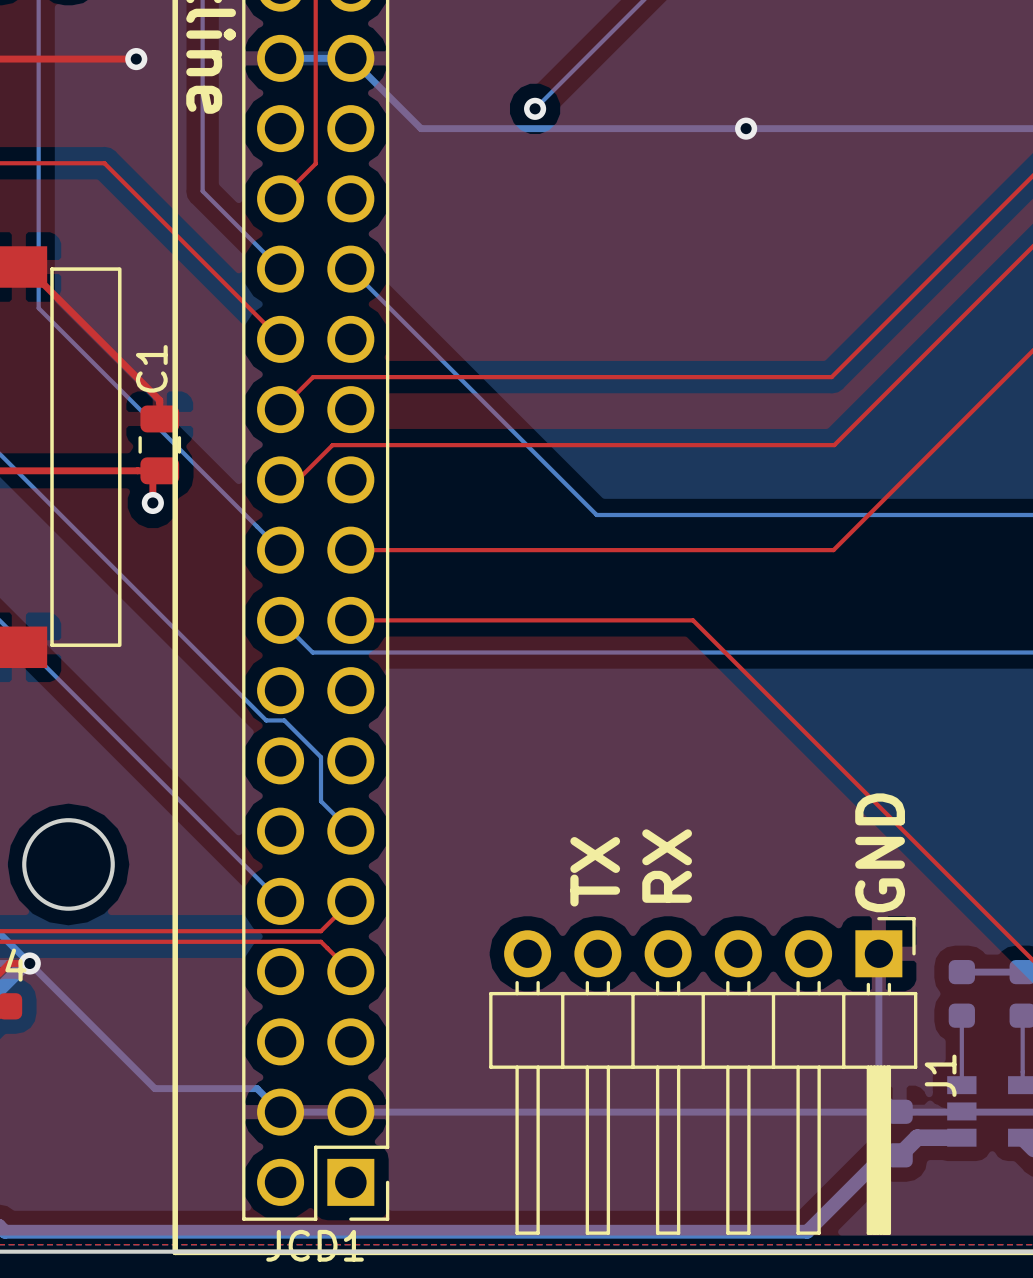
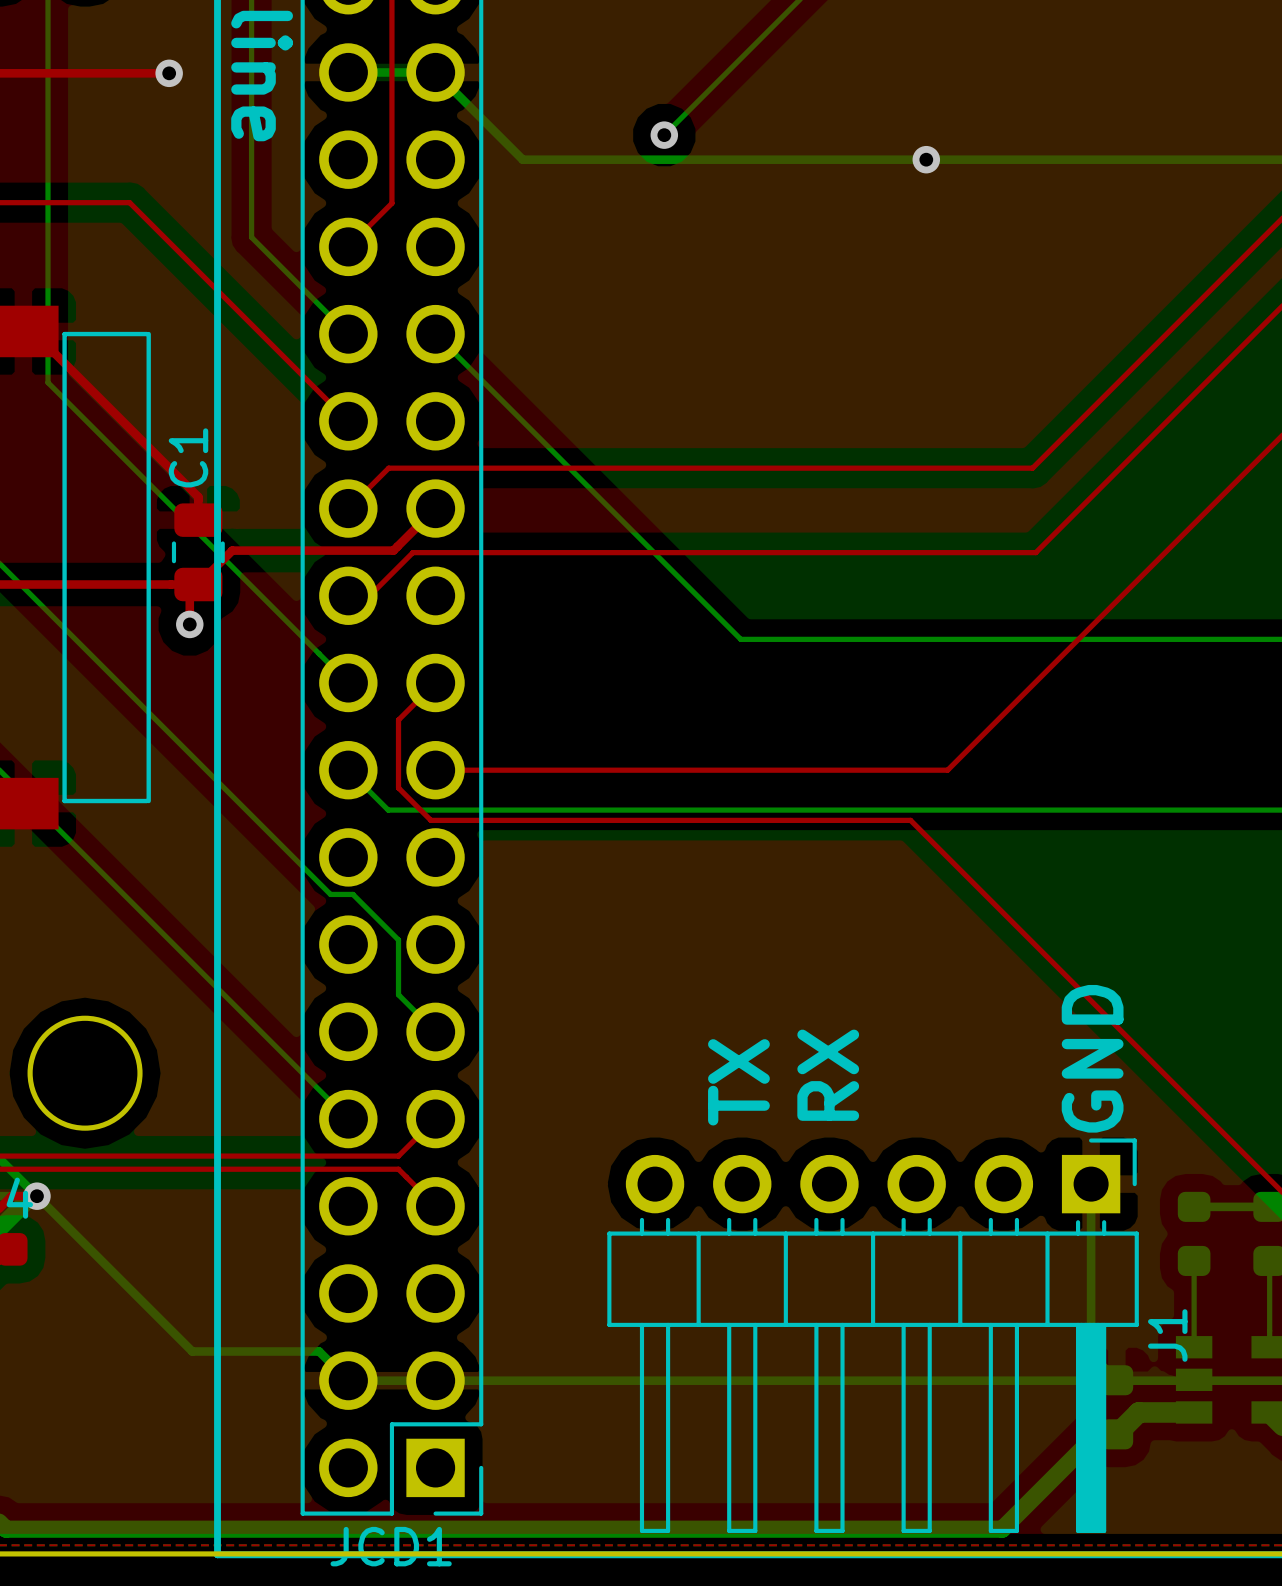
top track: none -> (435, 508) (393, 550) (232, 550) (198, 584)
top track: (350, 550) (833, 550) -> (435, 682) (398, 720) (398, 787) (430, 820) (910, 820)
top track: (693, 620) (733, 660) -> (860, 770) (947, 770) (1034, 682)

